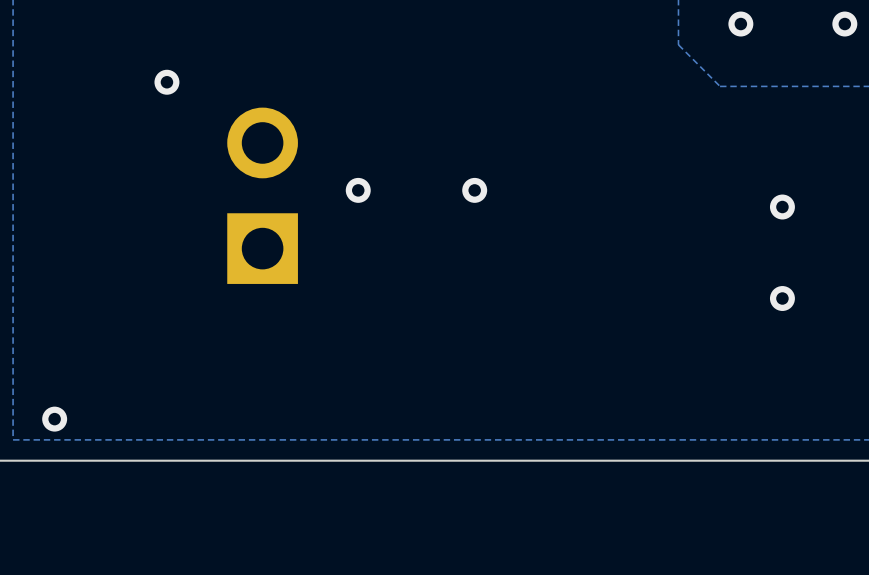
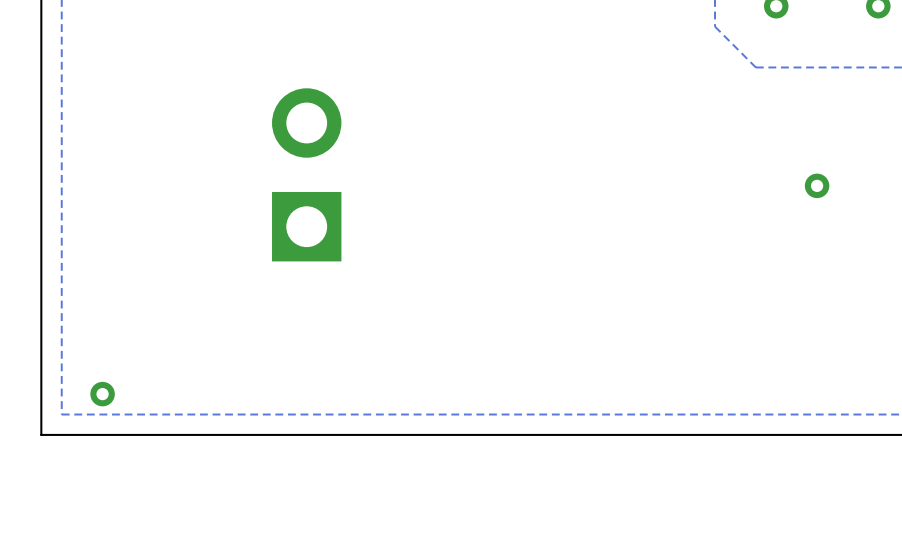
via: (166, 82) -> none
via: (358, 190) -> none
via: (474, 190) -> none
via: (782, 298) -> none

